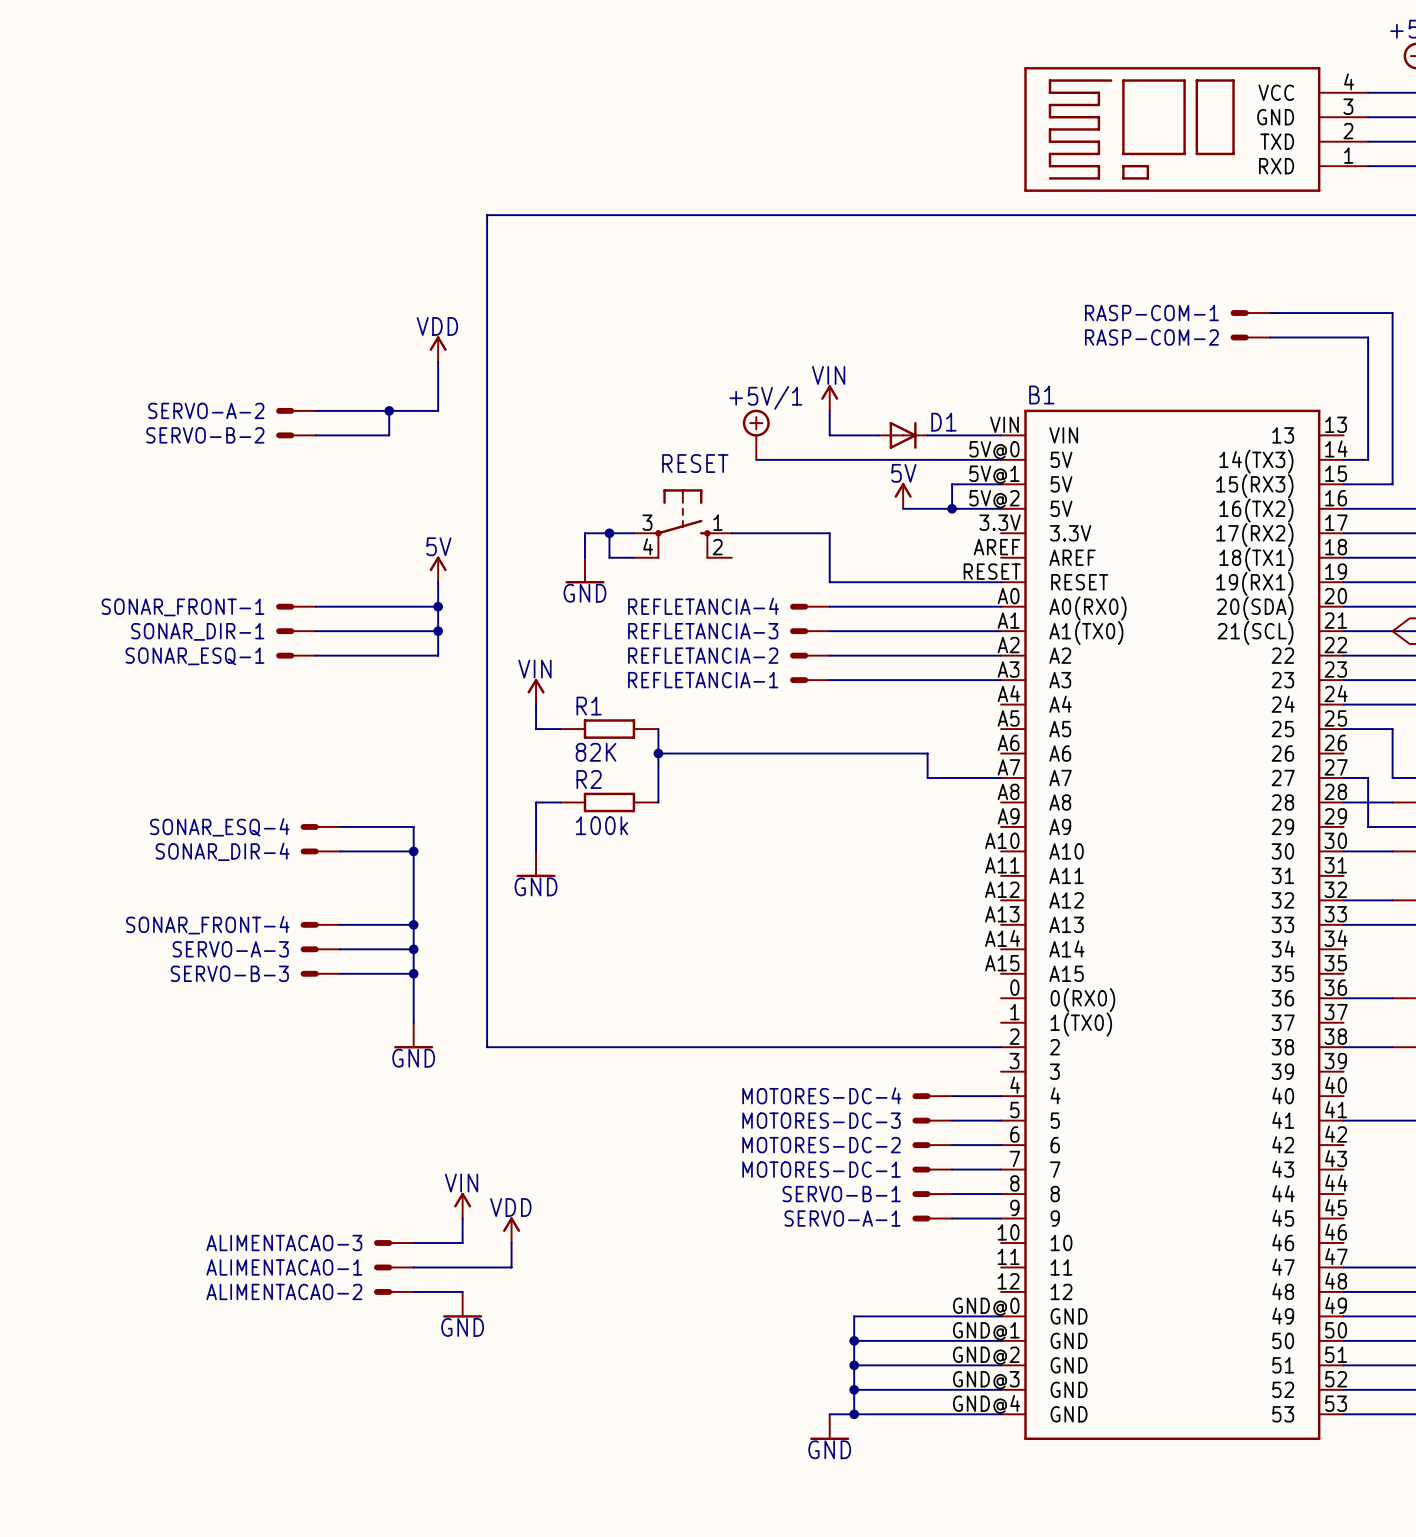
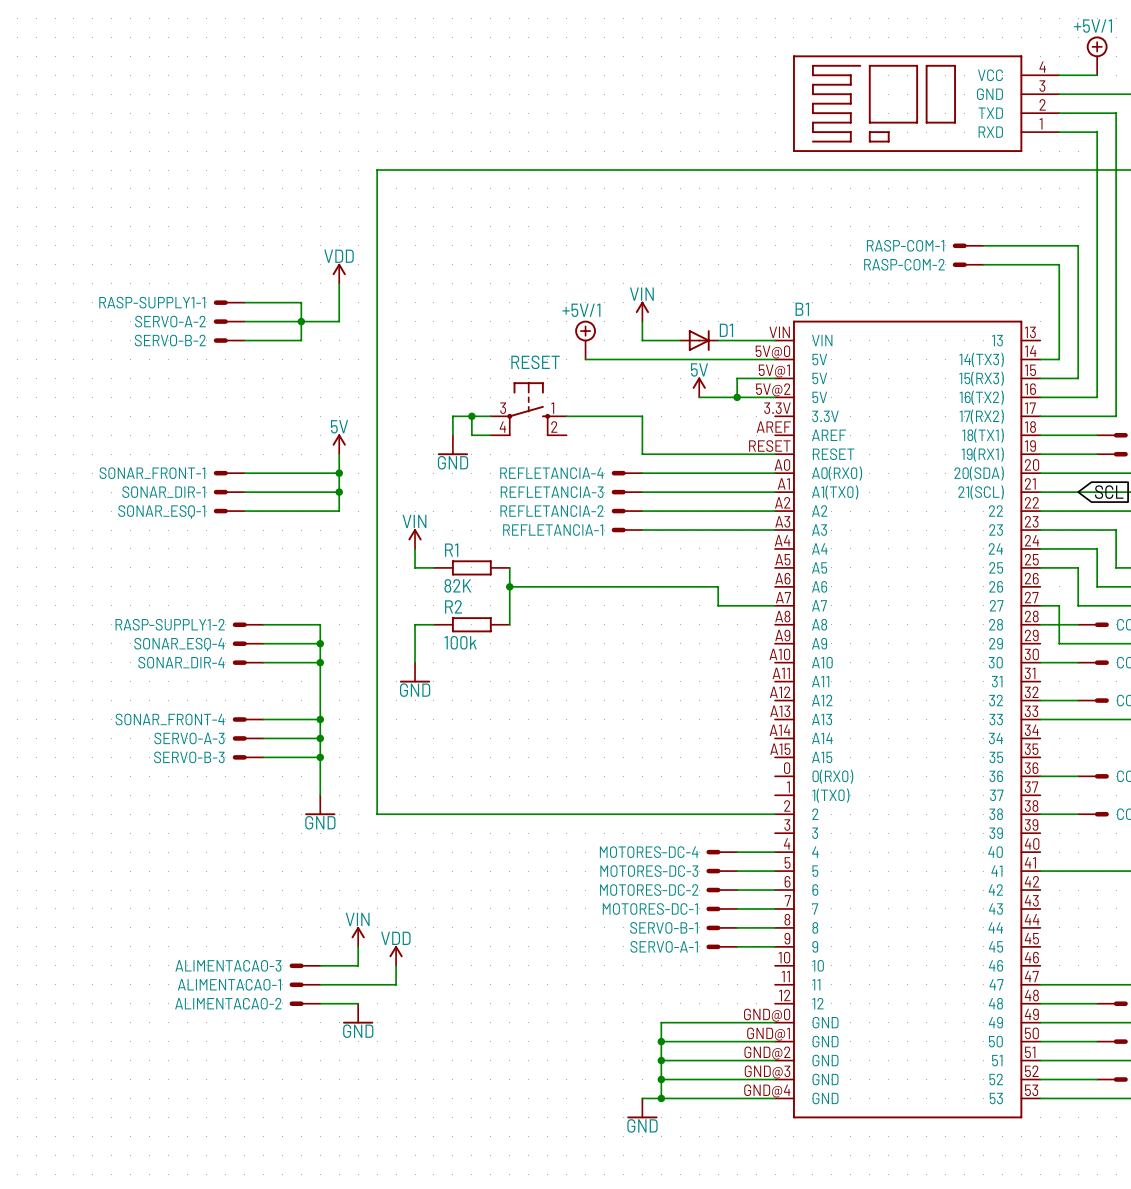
RASP-SUPPLY1-1: none -> (229, 302)
wire: none -> (244, 302) (301, 302) (301, 321)
RASP-SUPPLY1-2: none -> (248, 624)
wire: none -> (263, 624) (320, 624) (320, 643)
junction: none -> (320, 643)

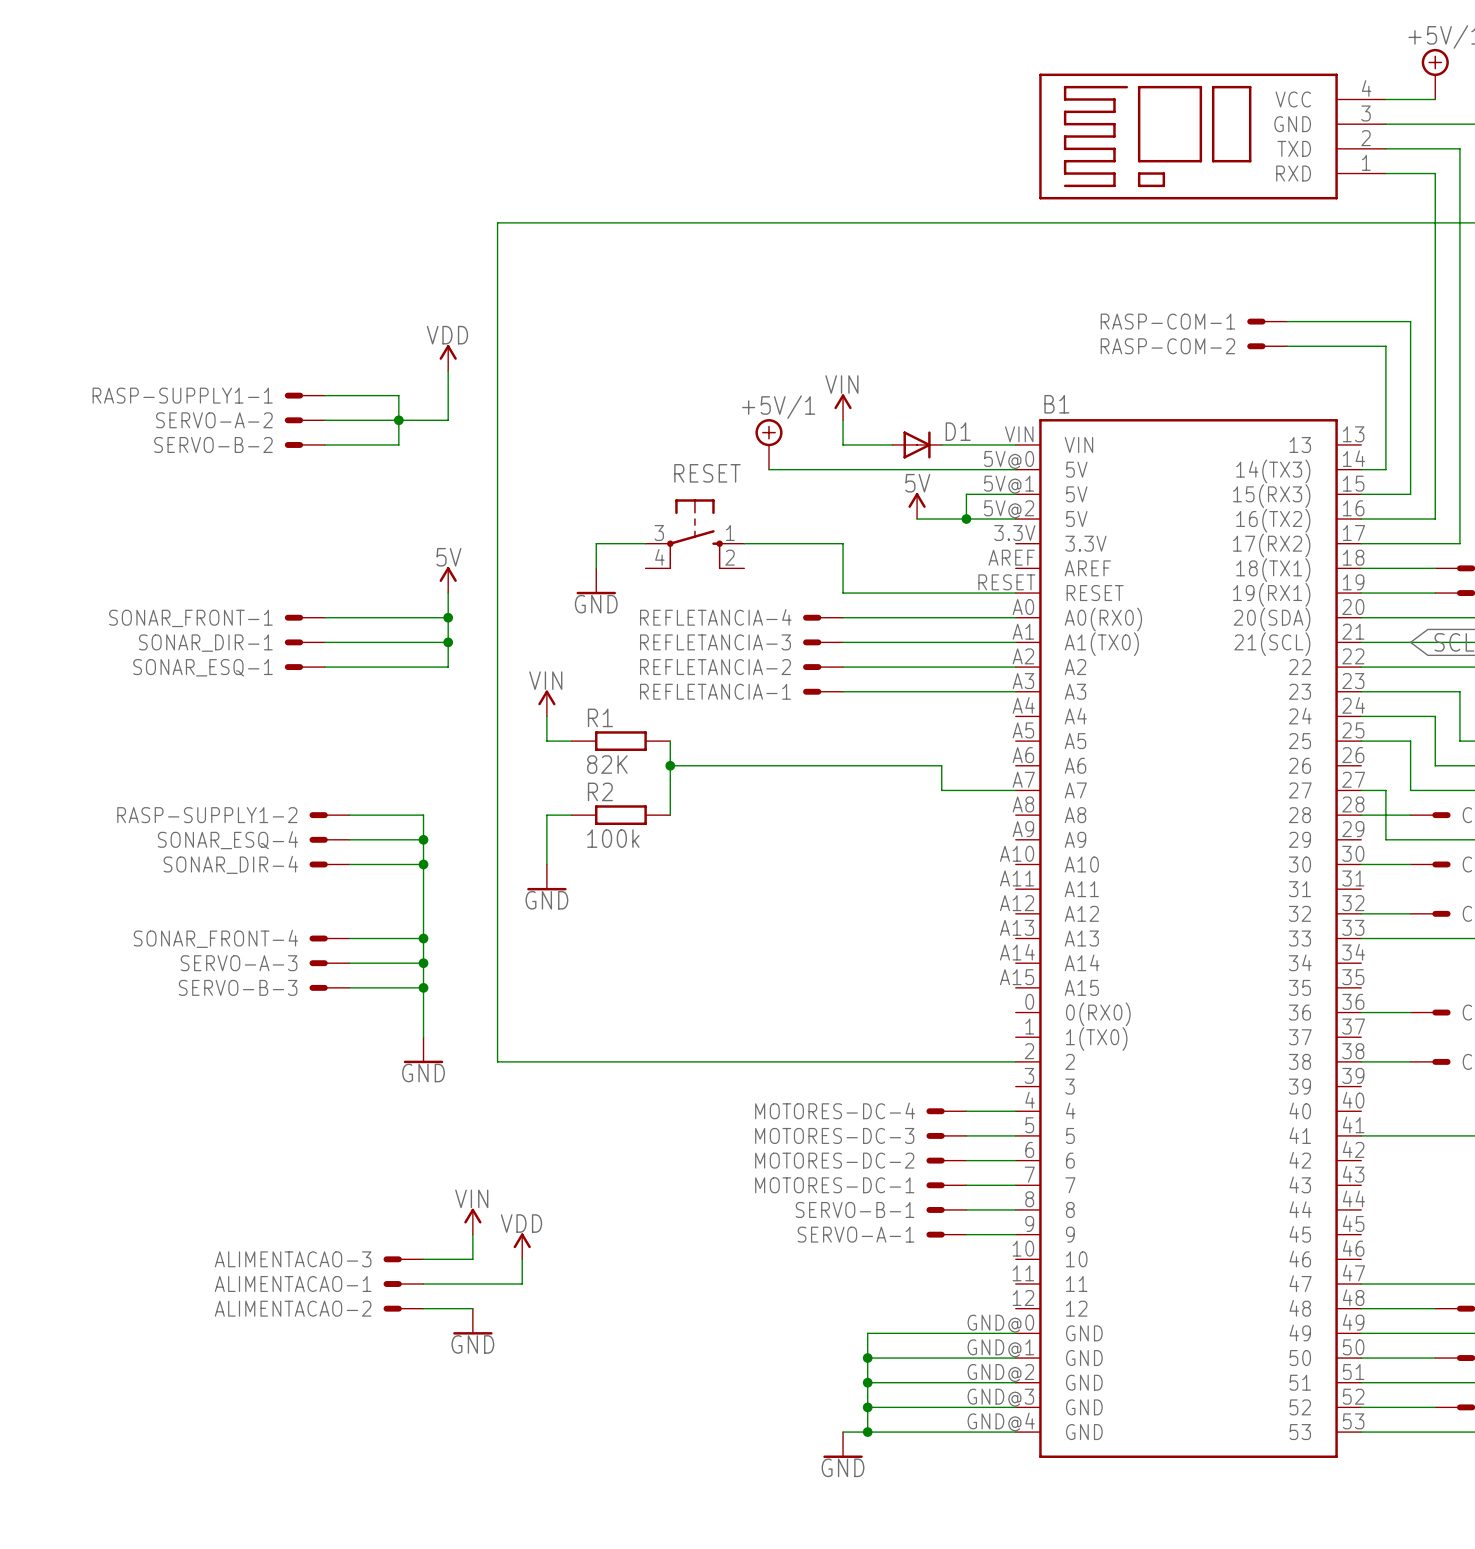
wire: (471, 416) (471, 435) (490, 435) -> none
junction: (471, 416) -> none

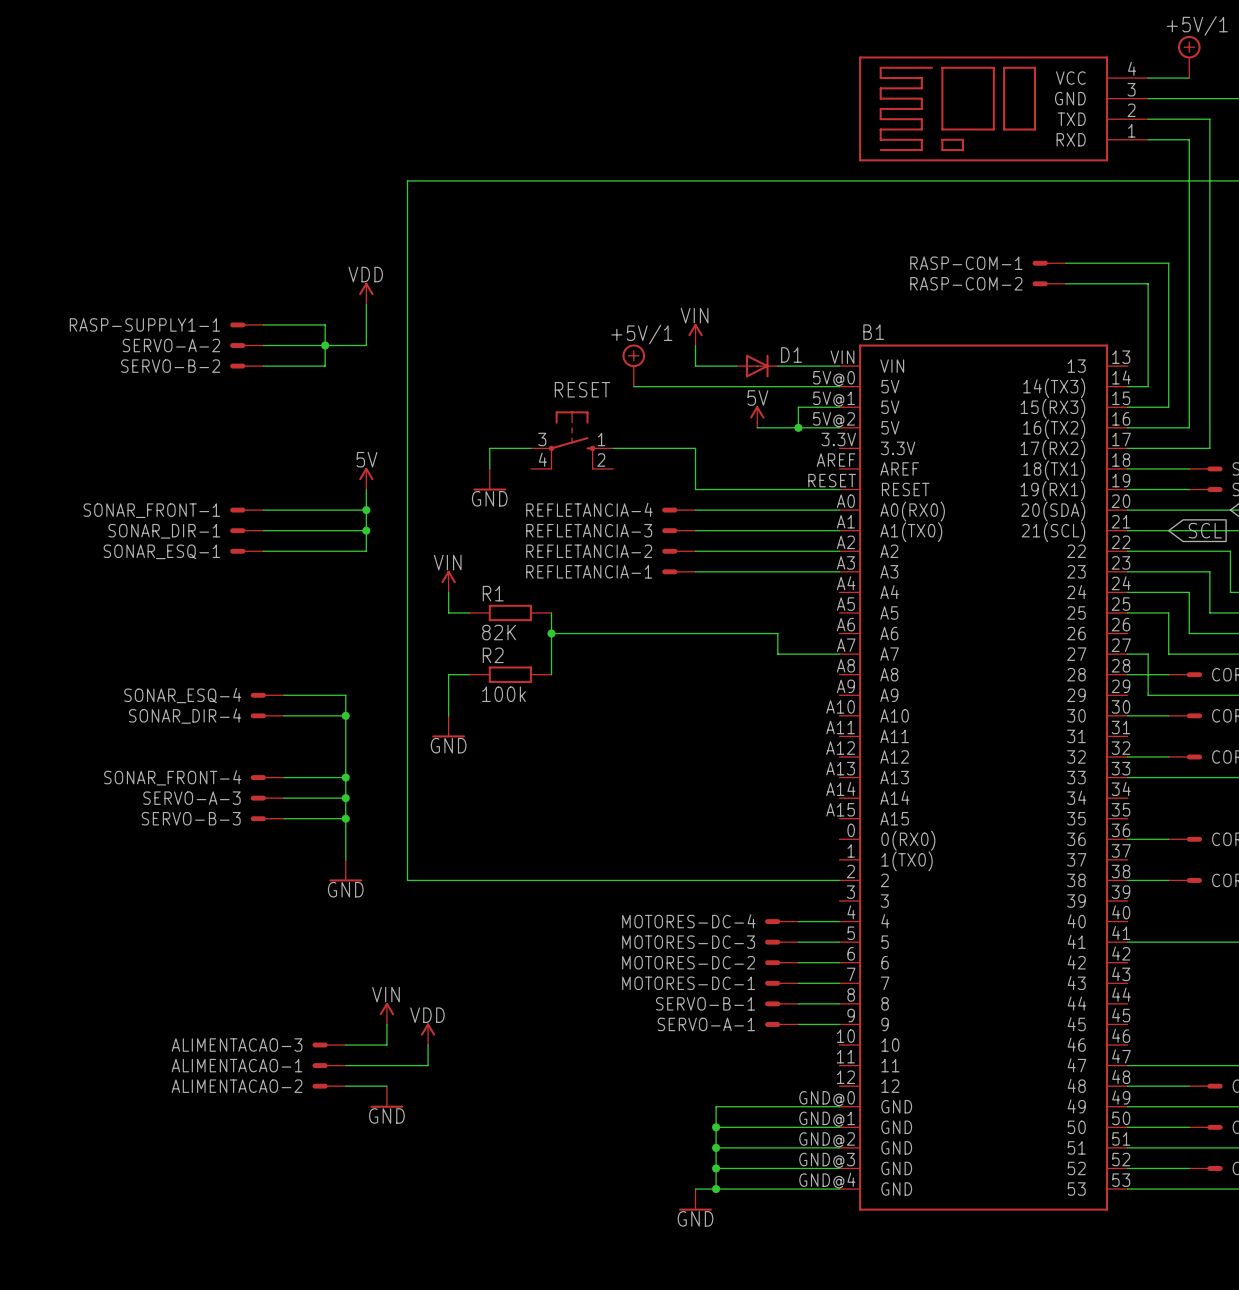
RASP-SUPPLY1-2: (329, 815) -> none
wire: (349, 815) (423, 815) (423, 839) -> none
junction: (423, 839) -> none

